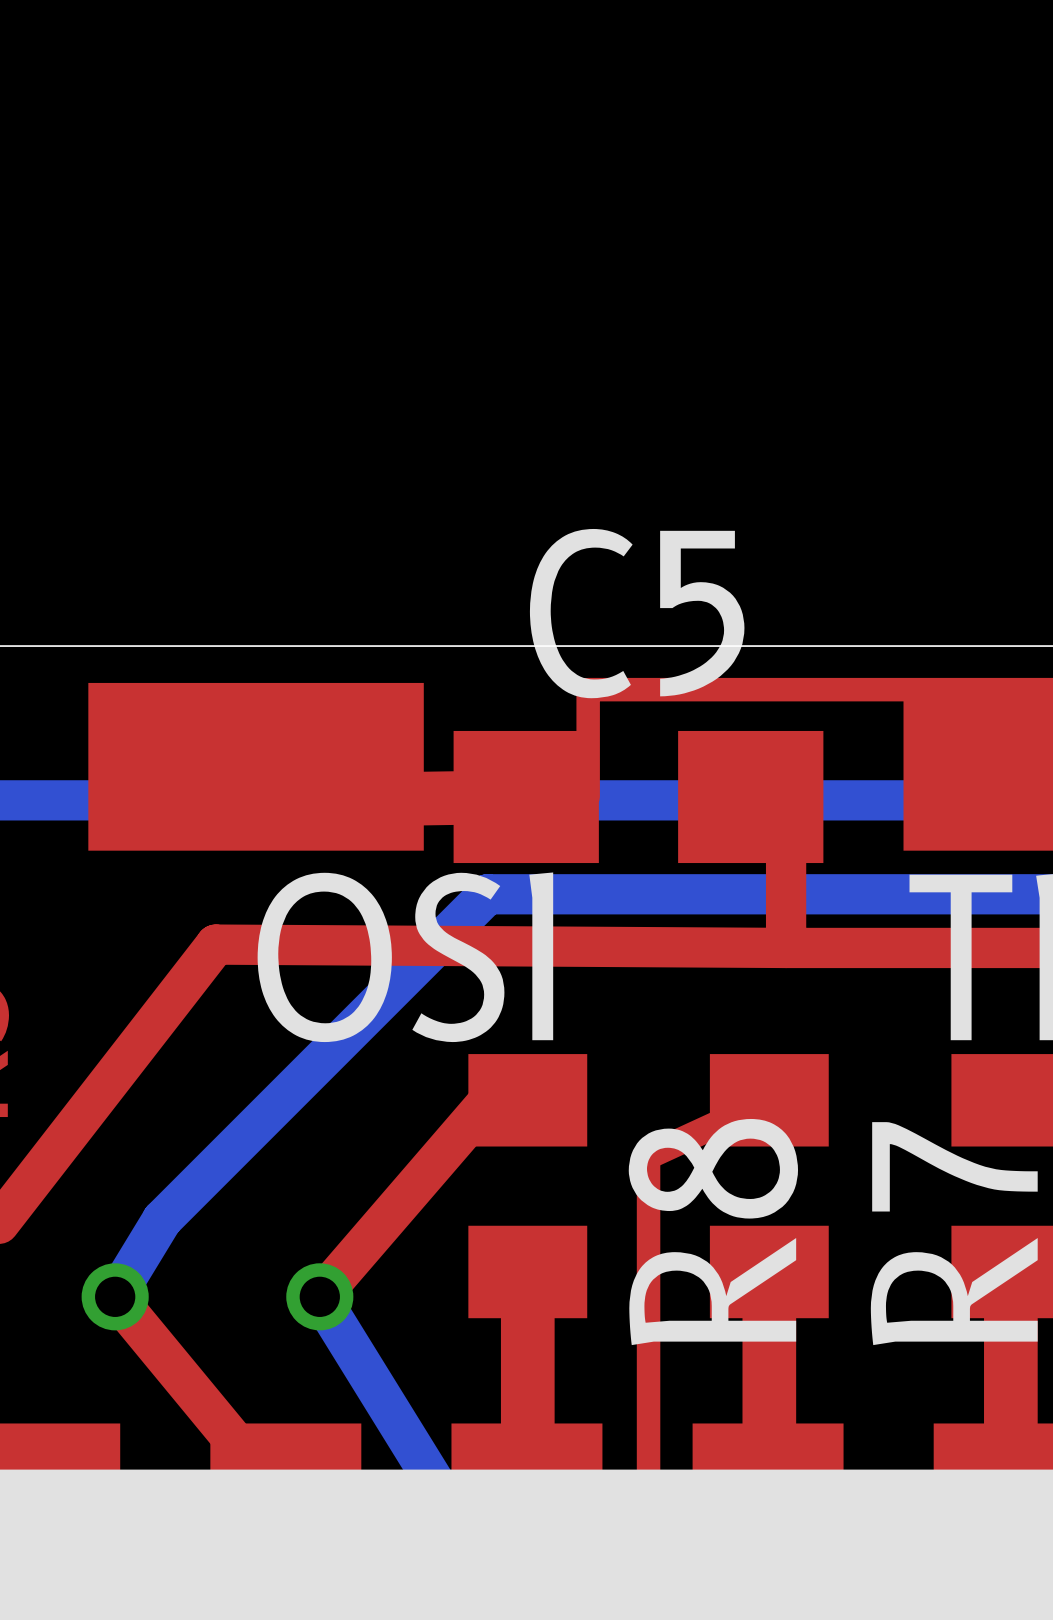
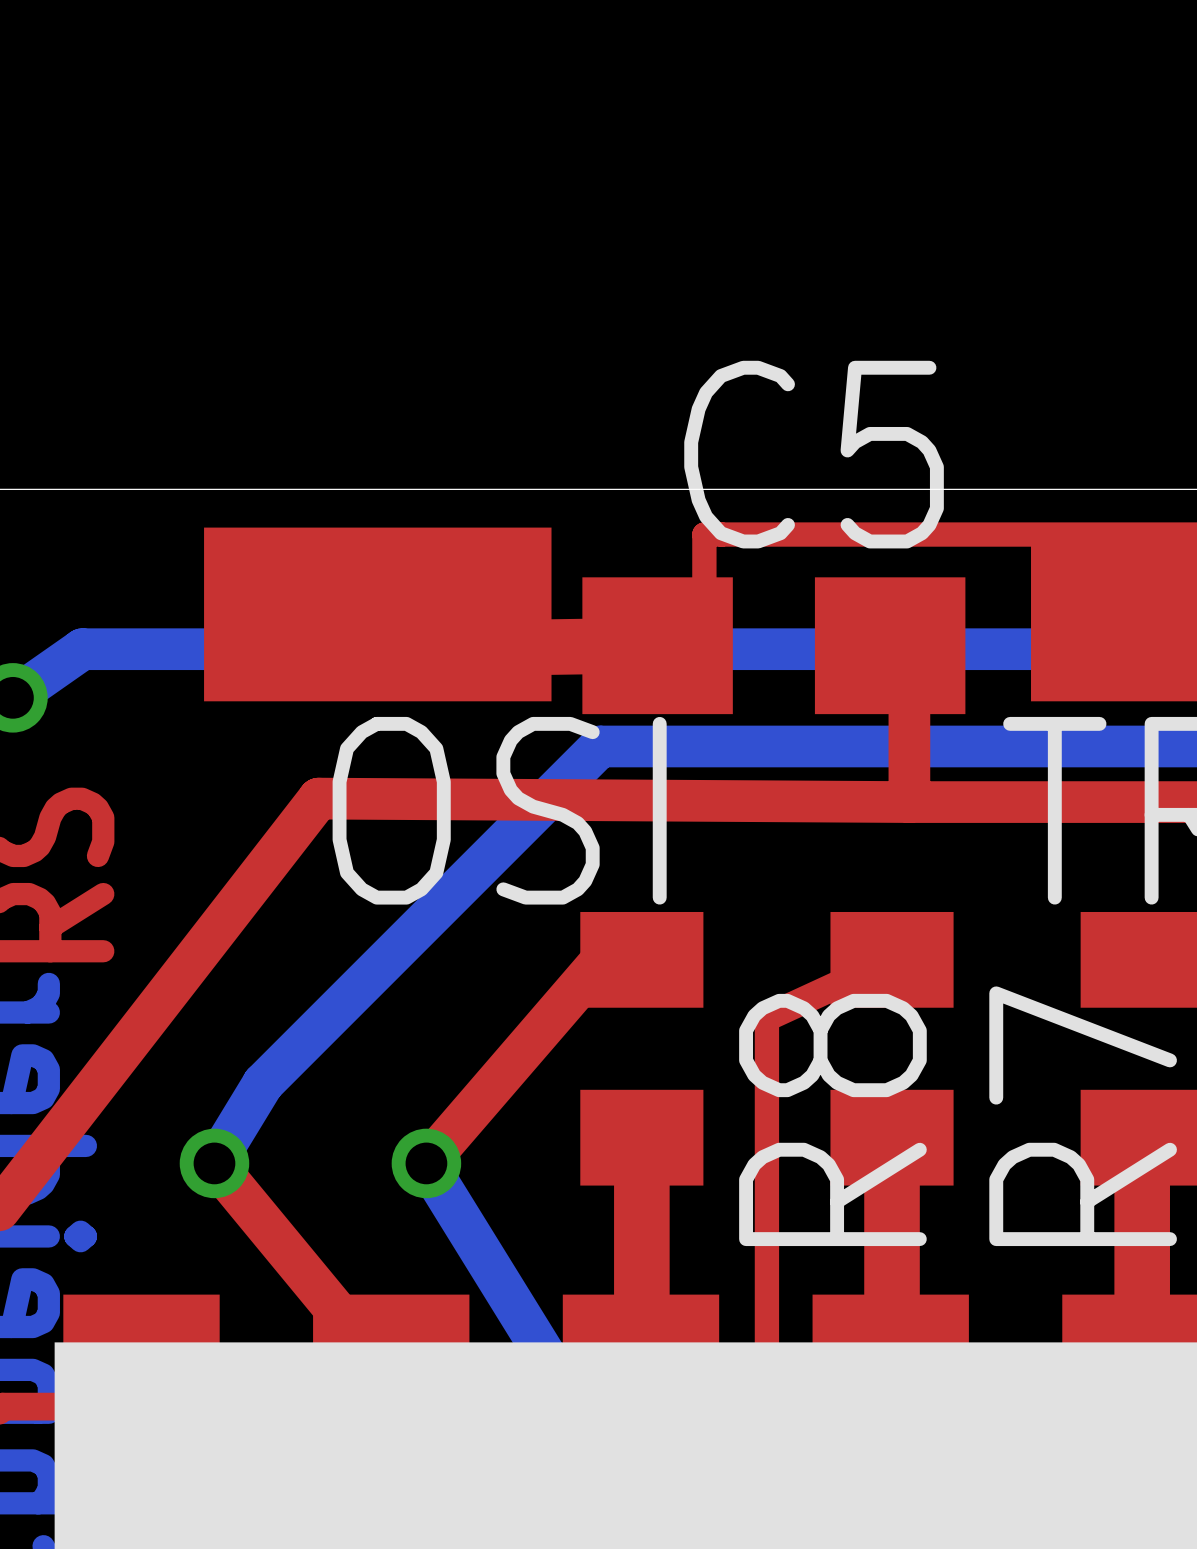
OSI position: (256, 766) -> (377, 614)
C5 position: (638, 797) -> (773, 645)

